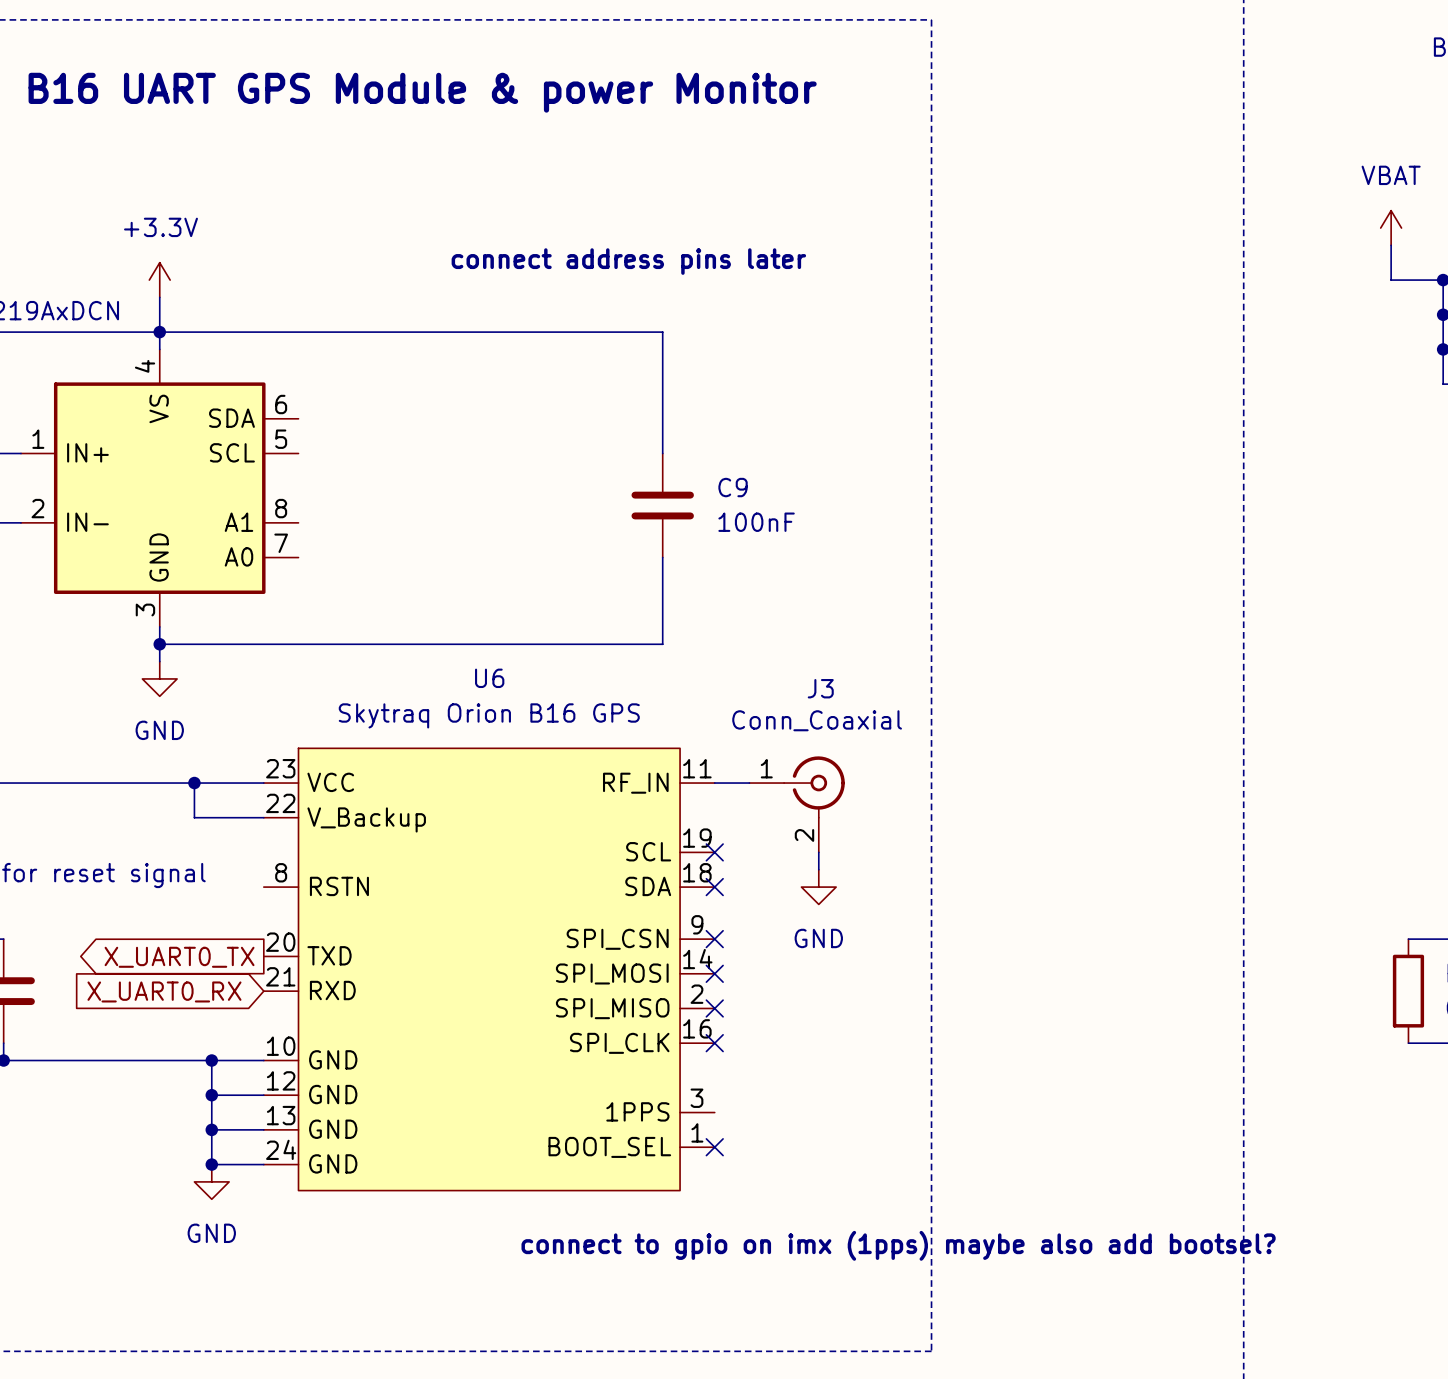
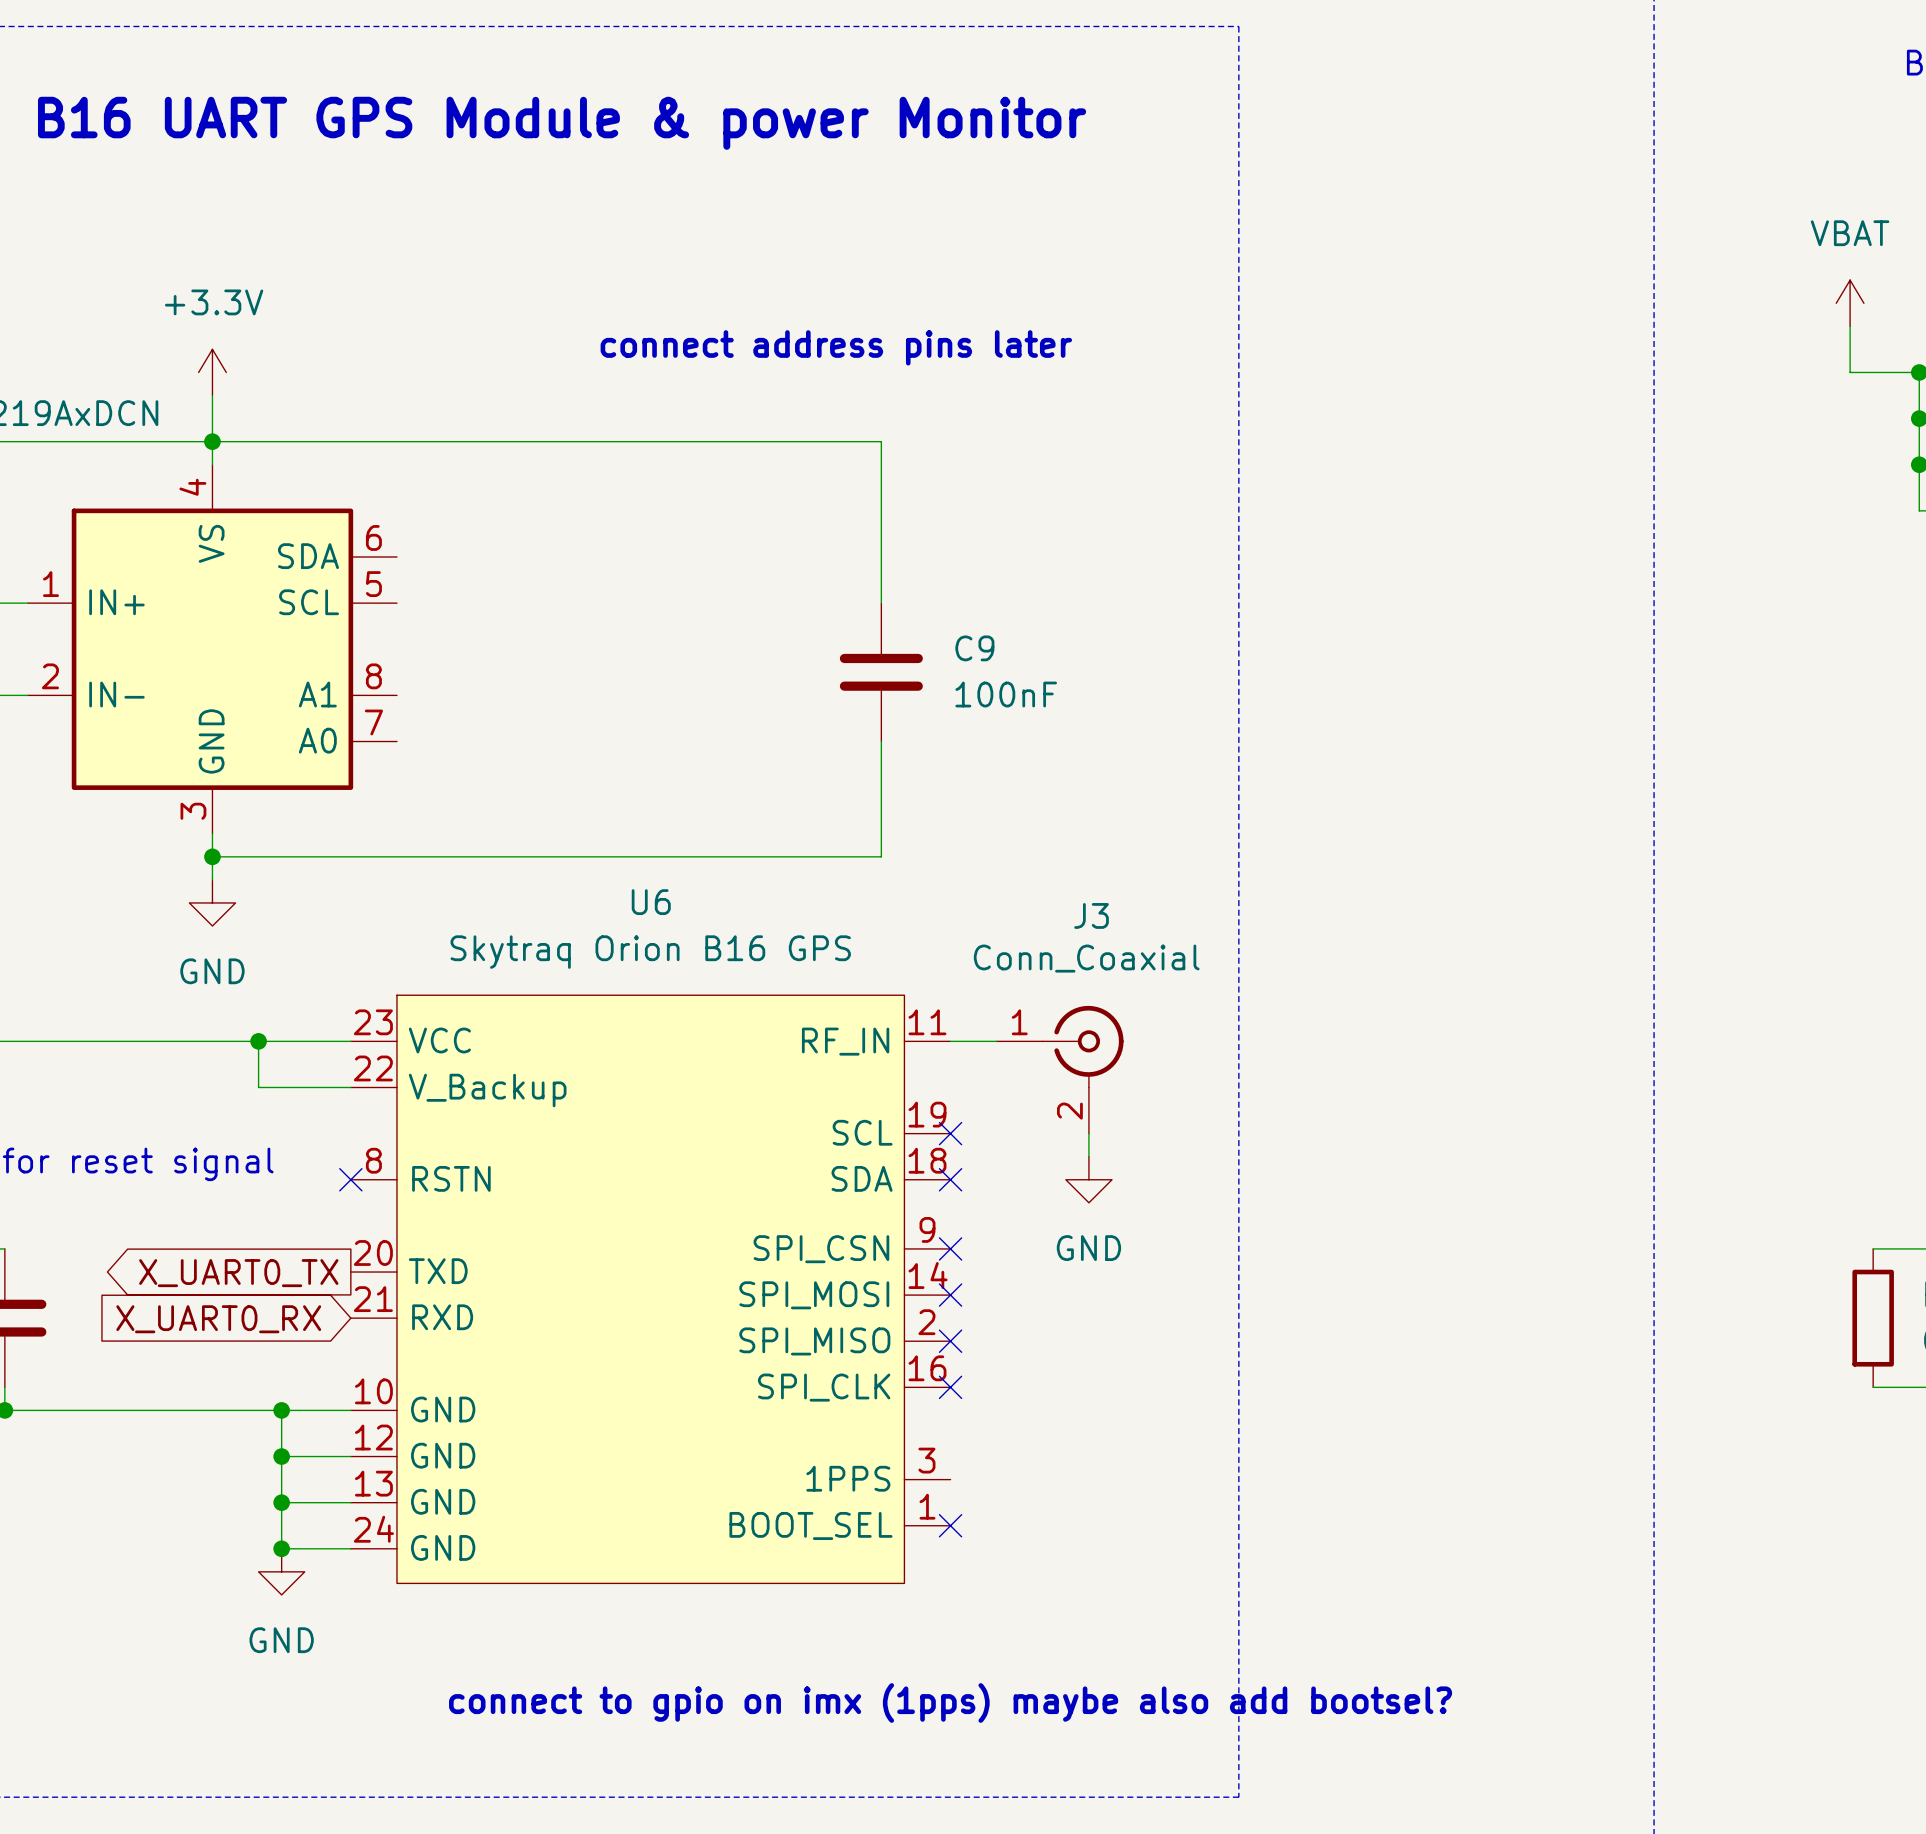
no-connect mark: none -> (350, 1179)
text position: connect to gpio on imx (1pps) maybe also add bootsel? (898, 1245) -> connect to gpio on imx (1pps) maybe also add bootsel? (950, 1702)

